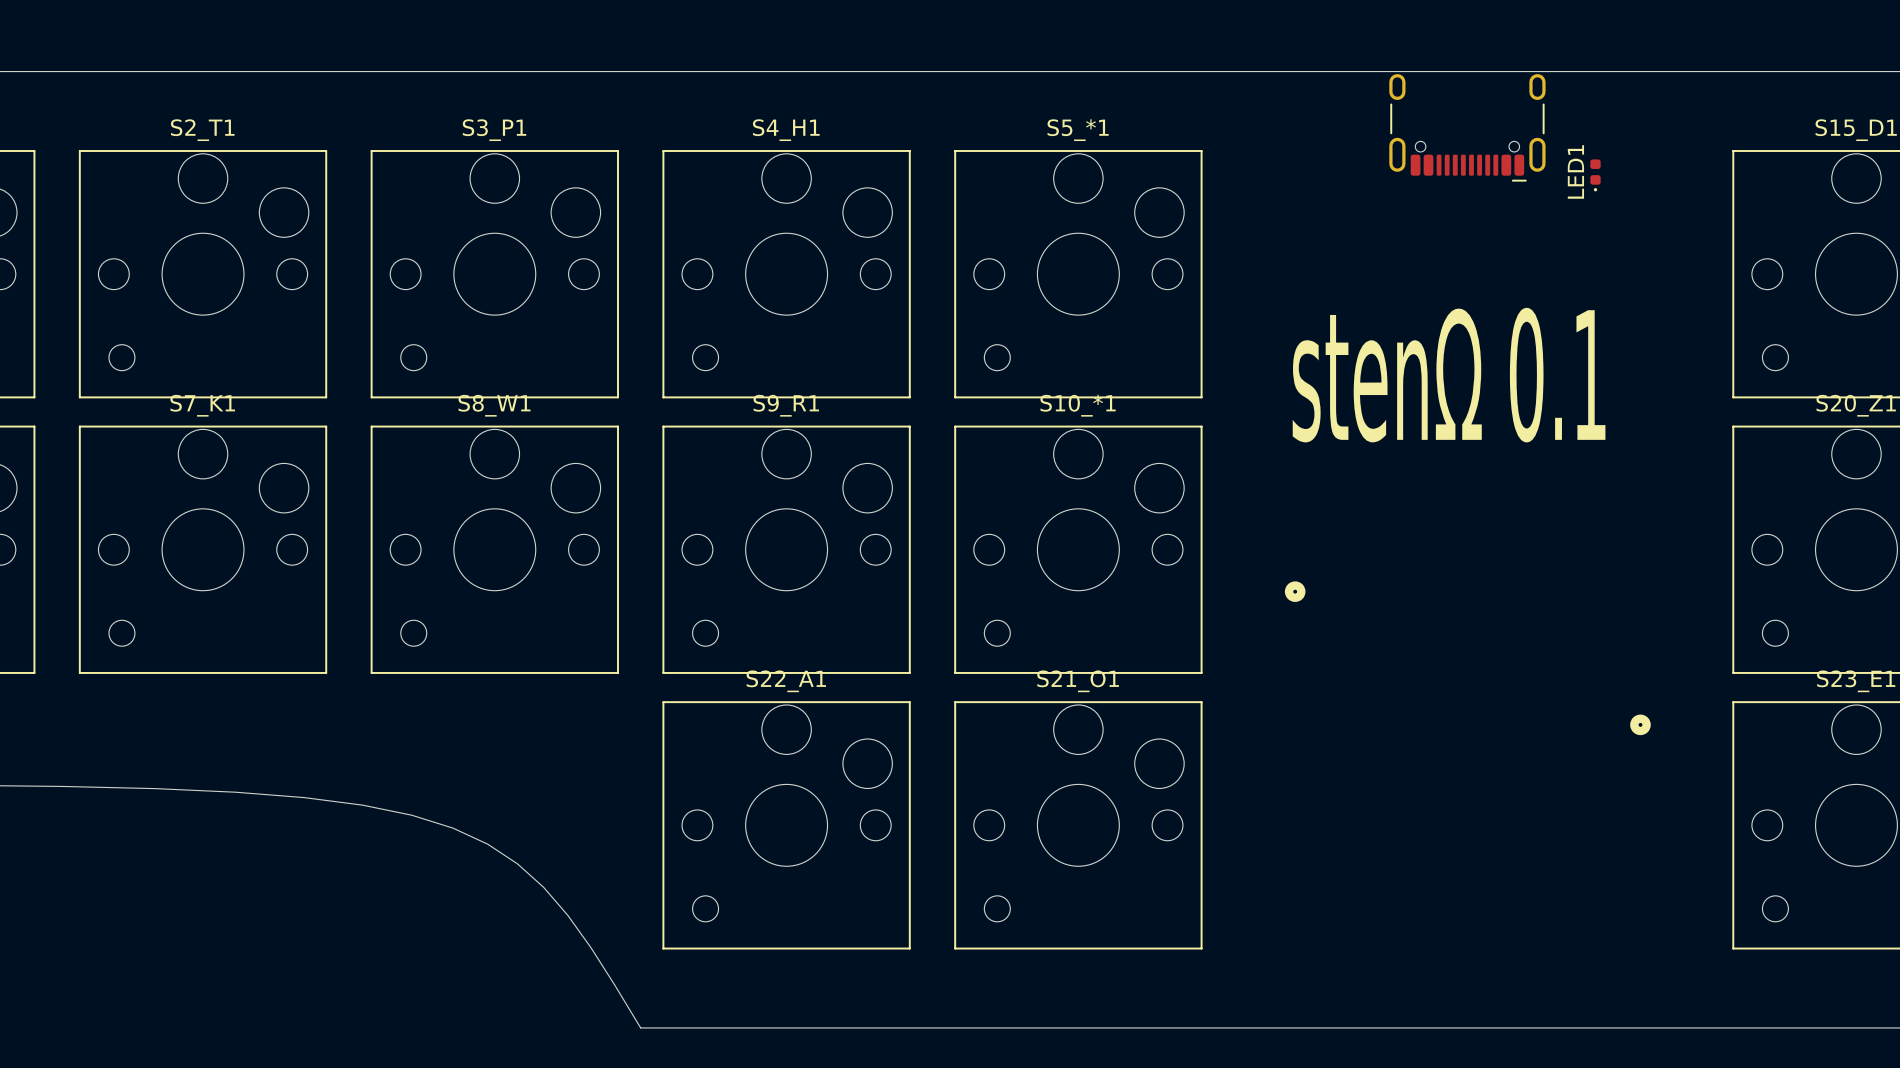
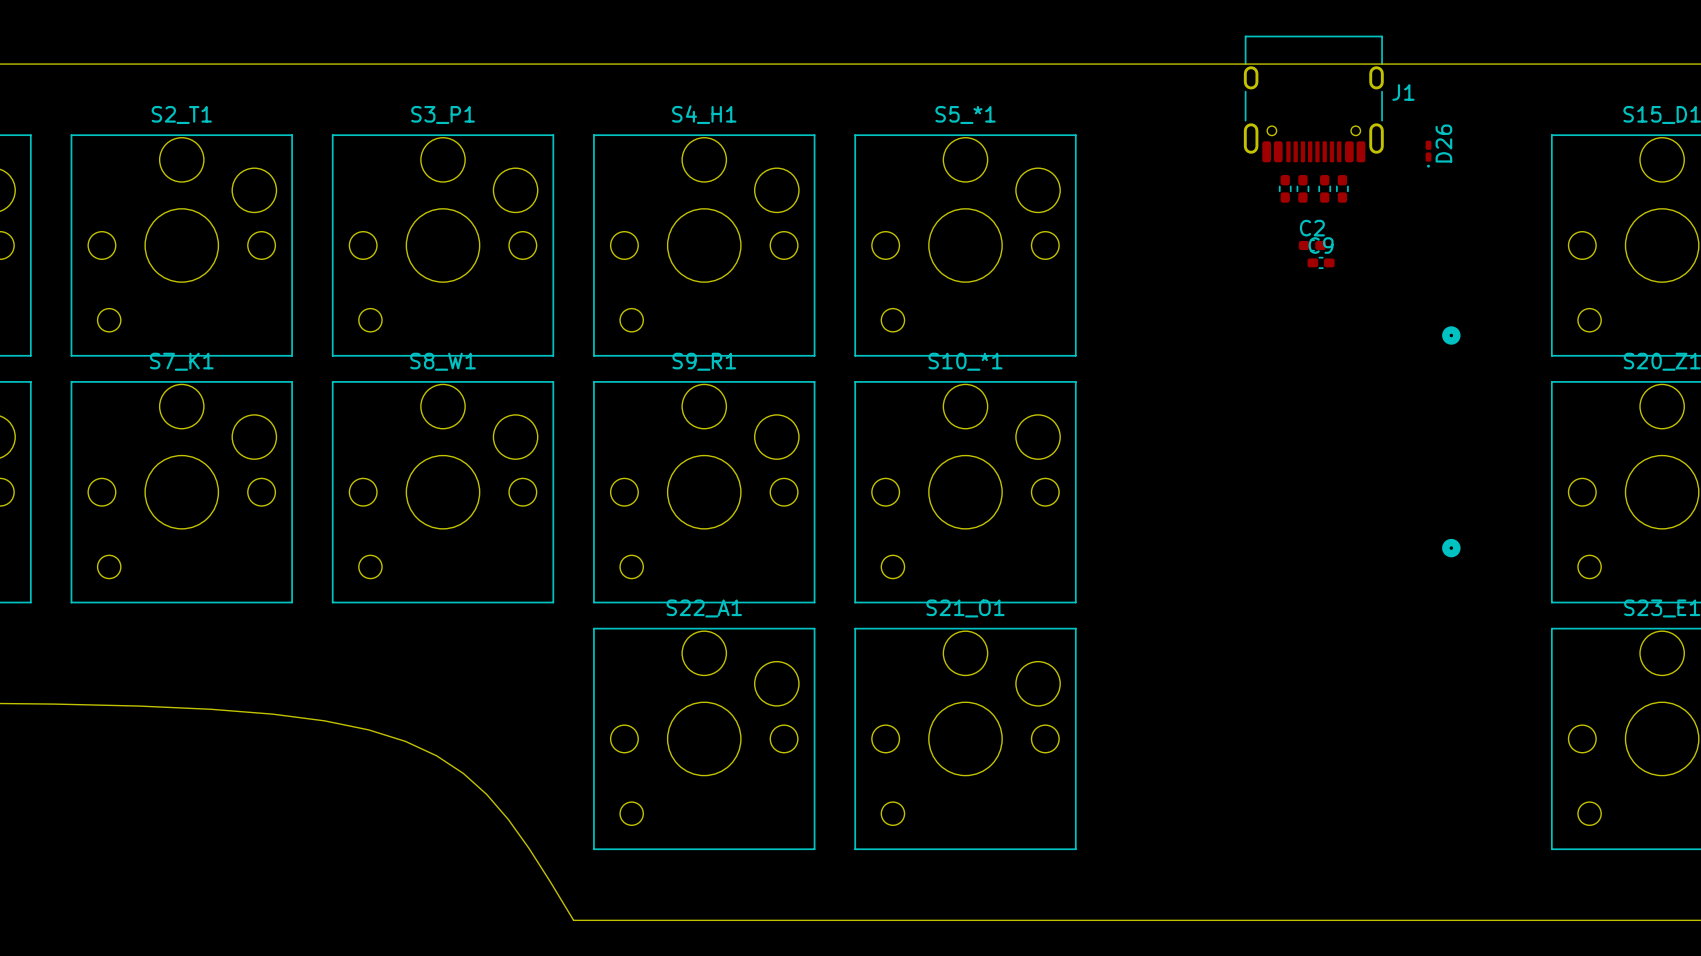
J1: none -> (1313, 98)
part: (1467, 127) -> none
D26: none -> (1428, 154)
LED1: (1595, 175) -> none
part: none -> (1285, 188)
part: none -> (1302, 188)
part: none -> (1324, 188)
part: none -> (1342, 188)
C2: none -> (1312, 245)
C9: none -> (1321, 262)
part: none -> (1451, 335)
text: stenΩ 0.1 (1449, 375) -> none
part: (1295, 591) -> none
part position: (1640, 724) -> (1451, 548)

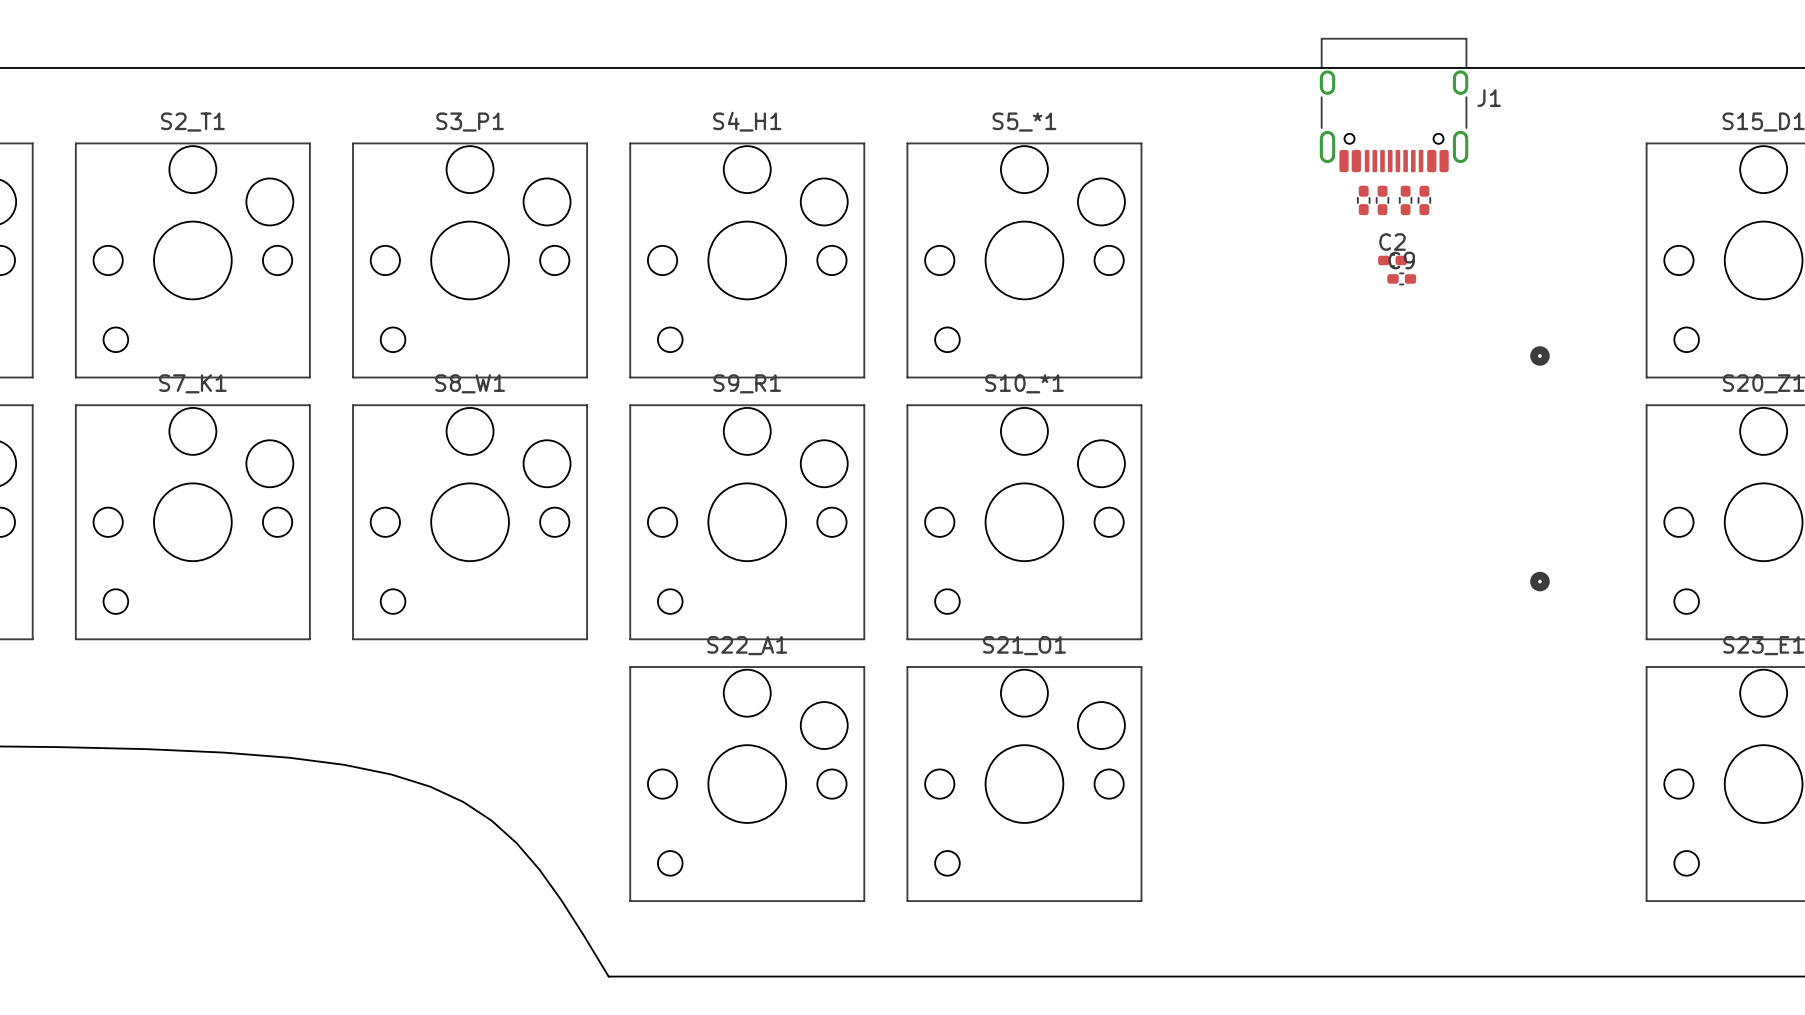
D26: (1428, 154) -> none

